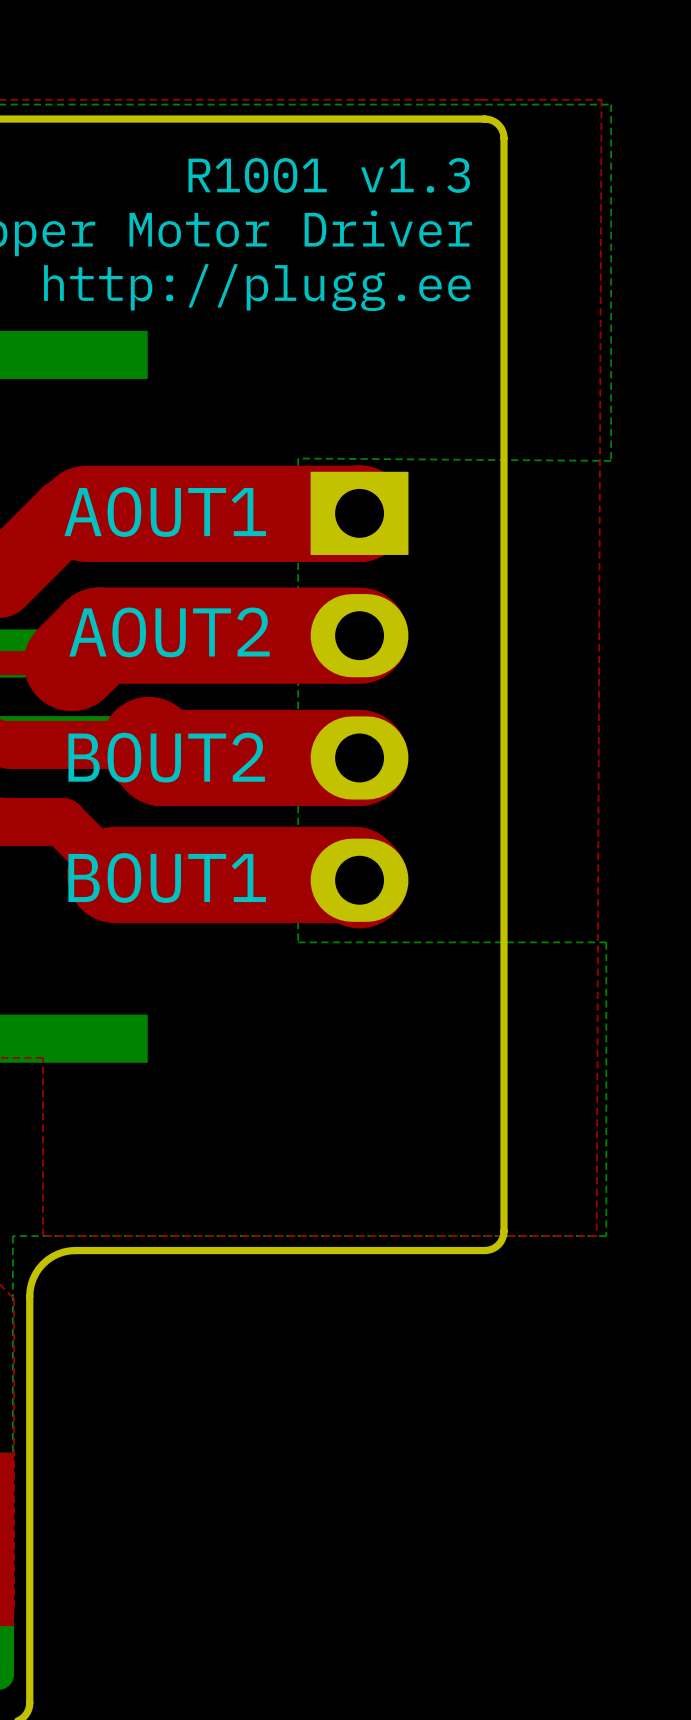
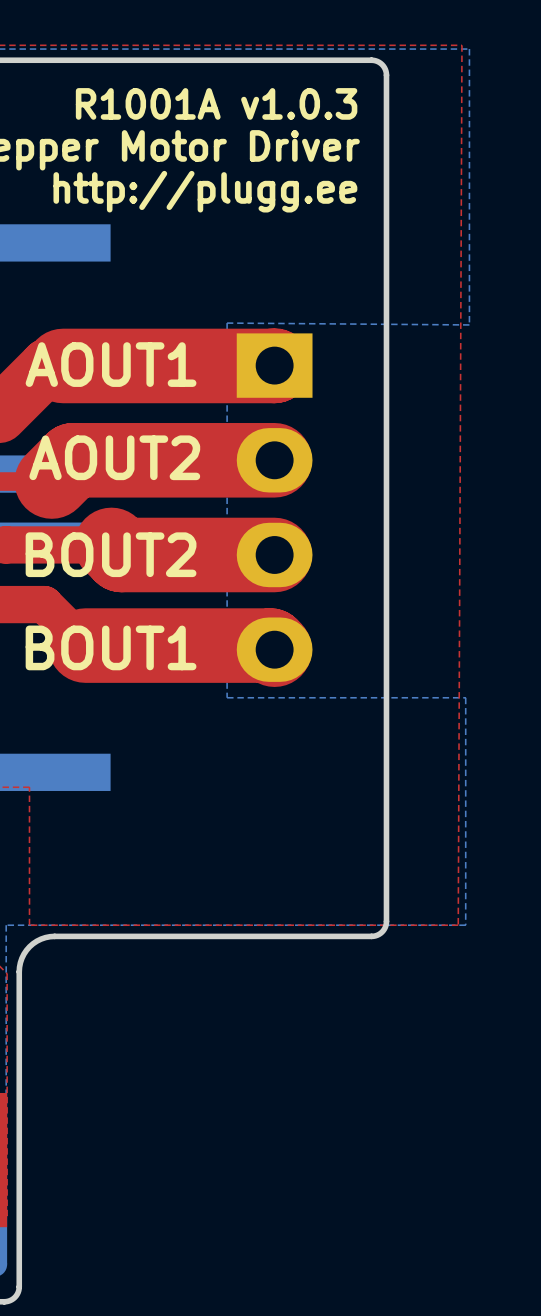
text: R1001 v1.3 (329, 175) -> R1001A v1.0.3 (216, 103)

